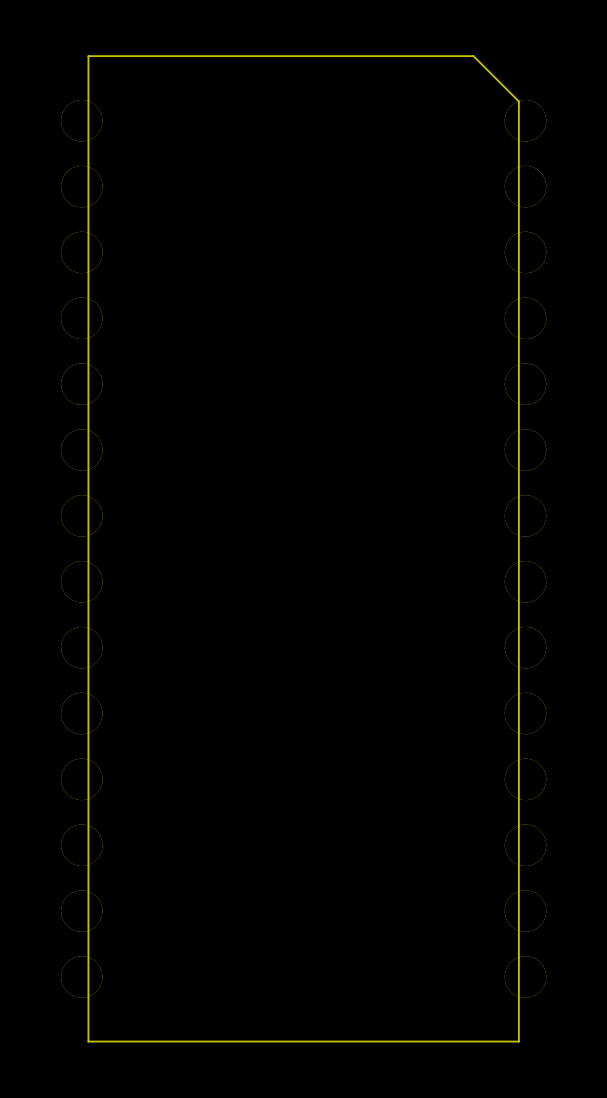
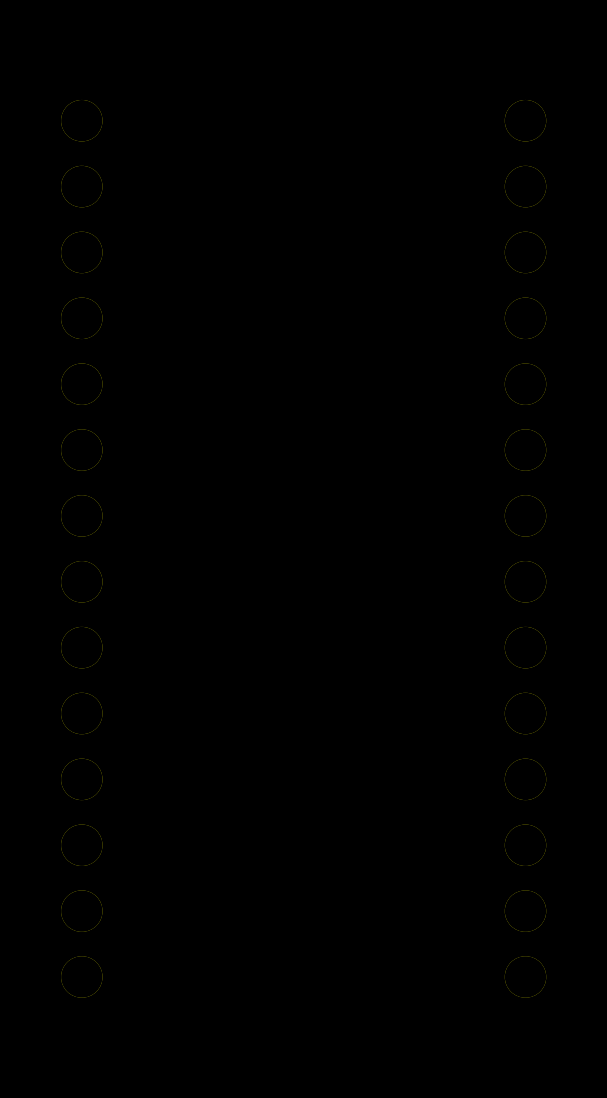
board edge: (473, 56) (518, 101) (518, 1041) (88, 1041) (88, 56) (473, 56) -> none

